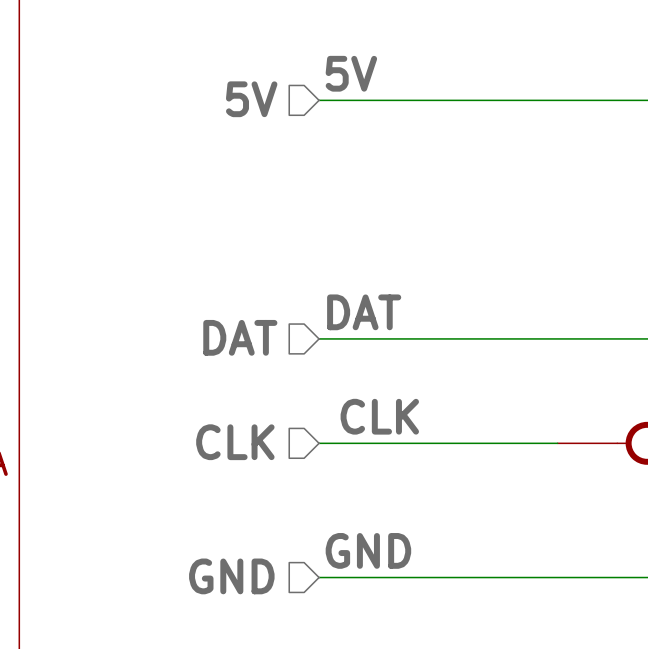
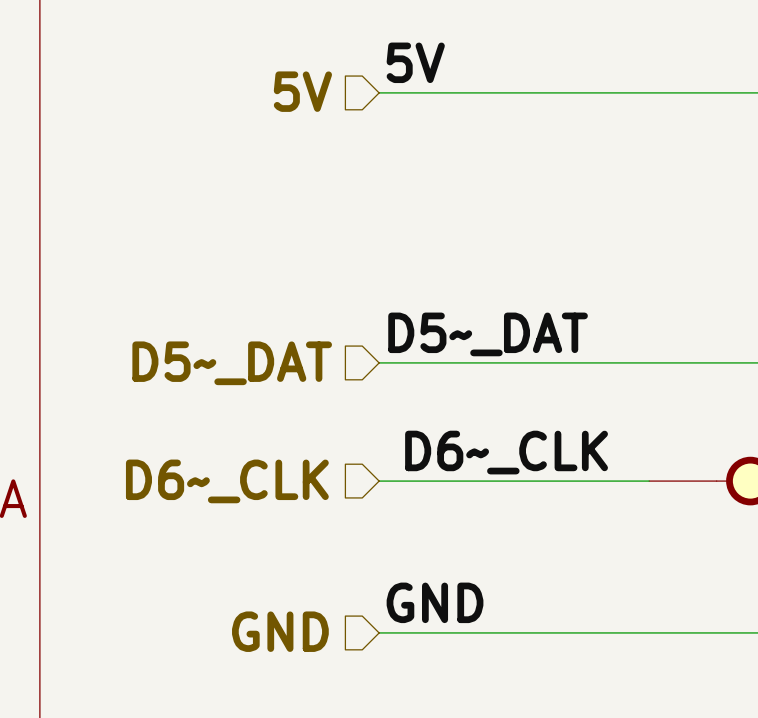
label: DAT (364, 312) -> D5~_DAT (488, 334)
hierarchical label: DAT (240, 337) -> D5~_DAT (232, 363)
label: CLK (379, 416) -> D6~_CLK (506, 452)
hierarchical label: CLK (235, 442) -> D6~_CLK (227, 481)

